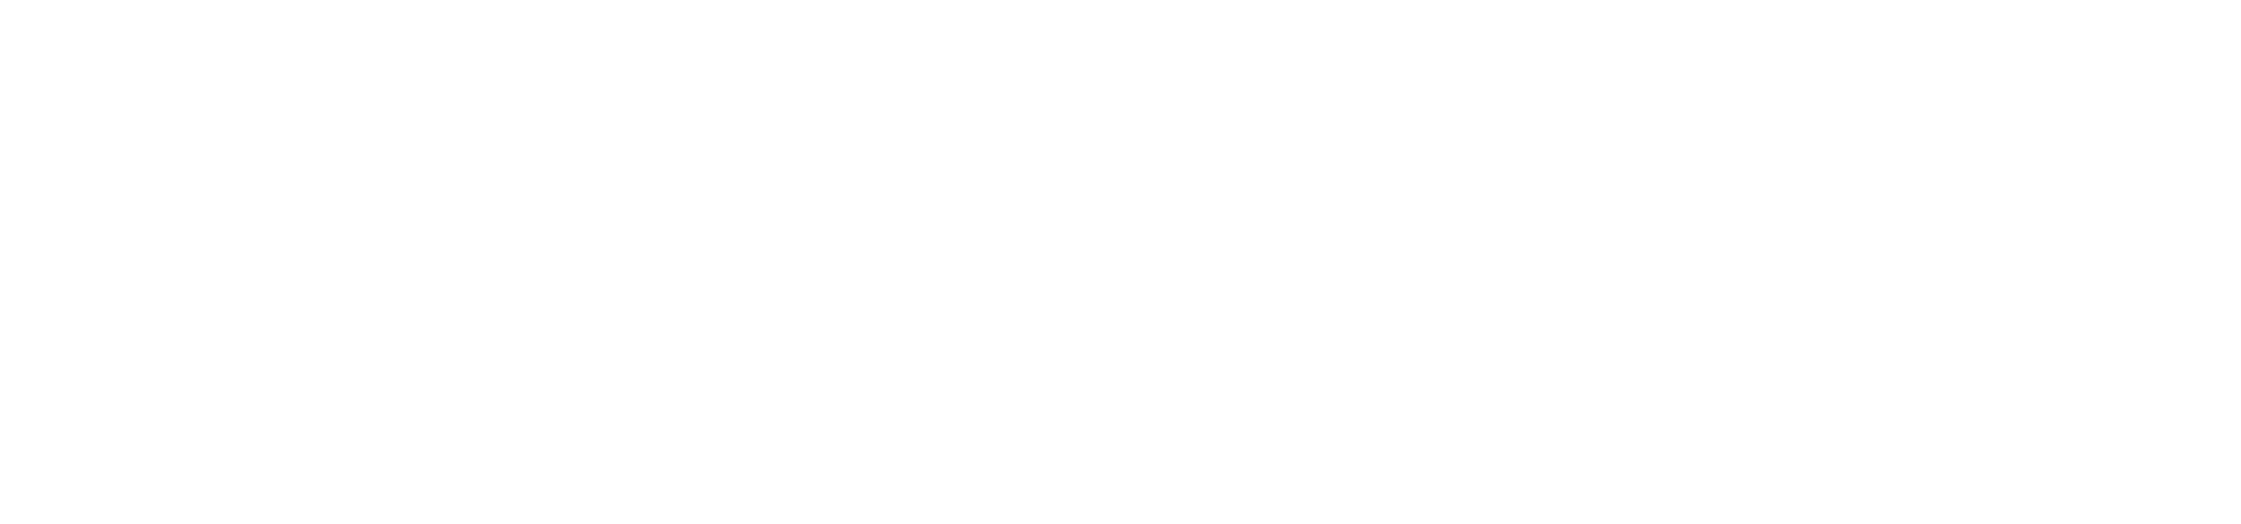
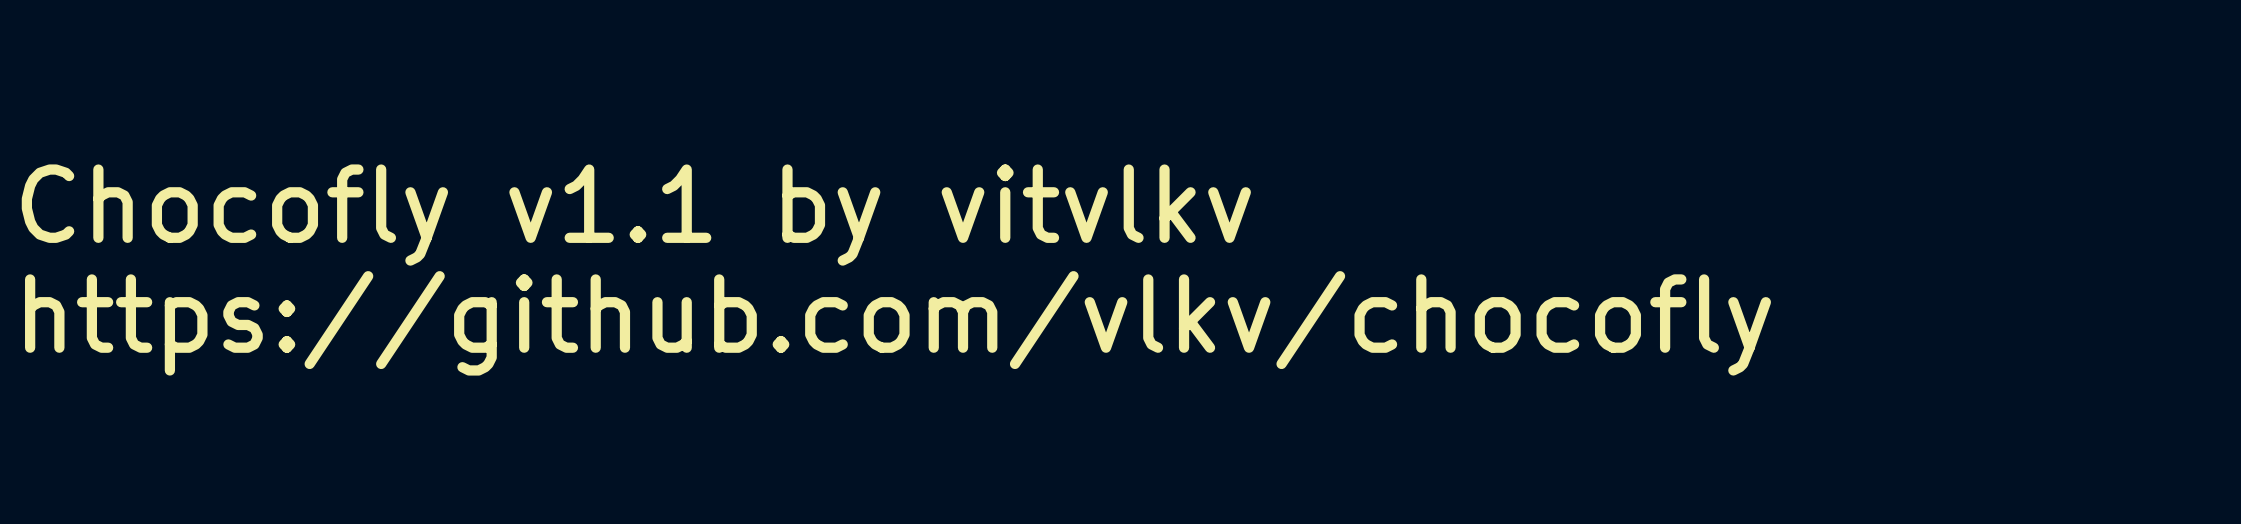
text: none -> Chocofly v1.1 by vitvlkv (636, 215)
text: none -> https://github.com/vlkv/chocofly (897, 323)

